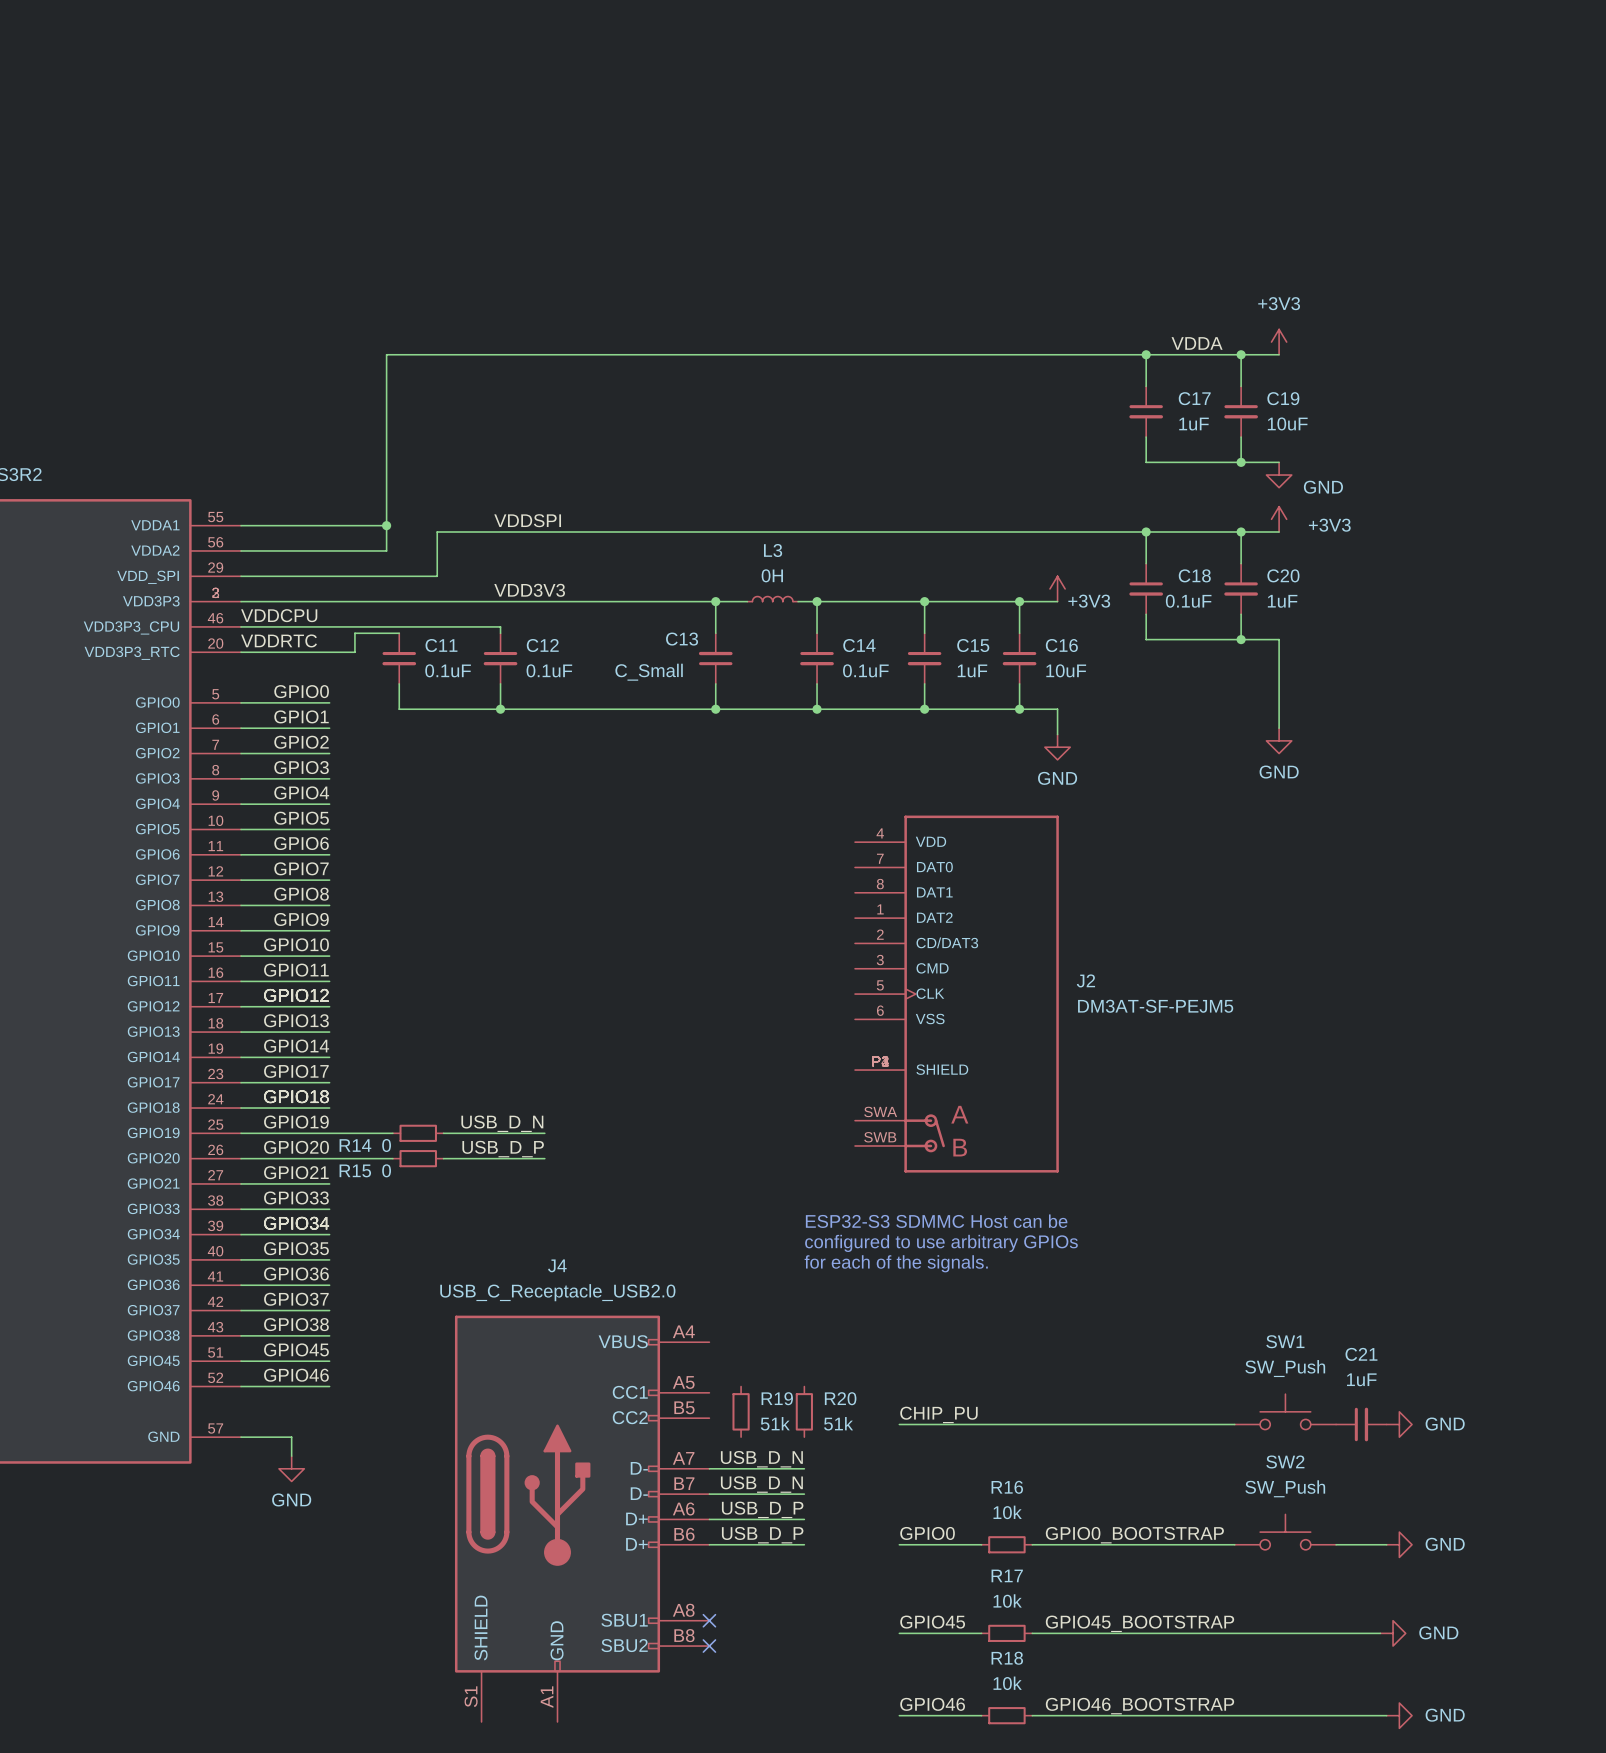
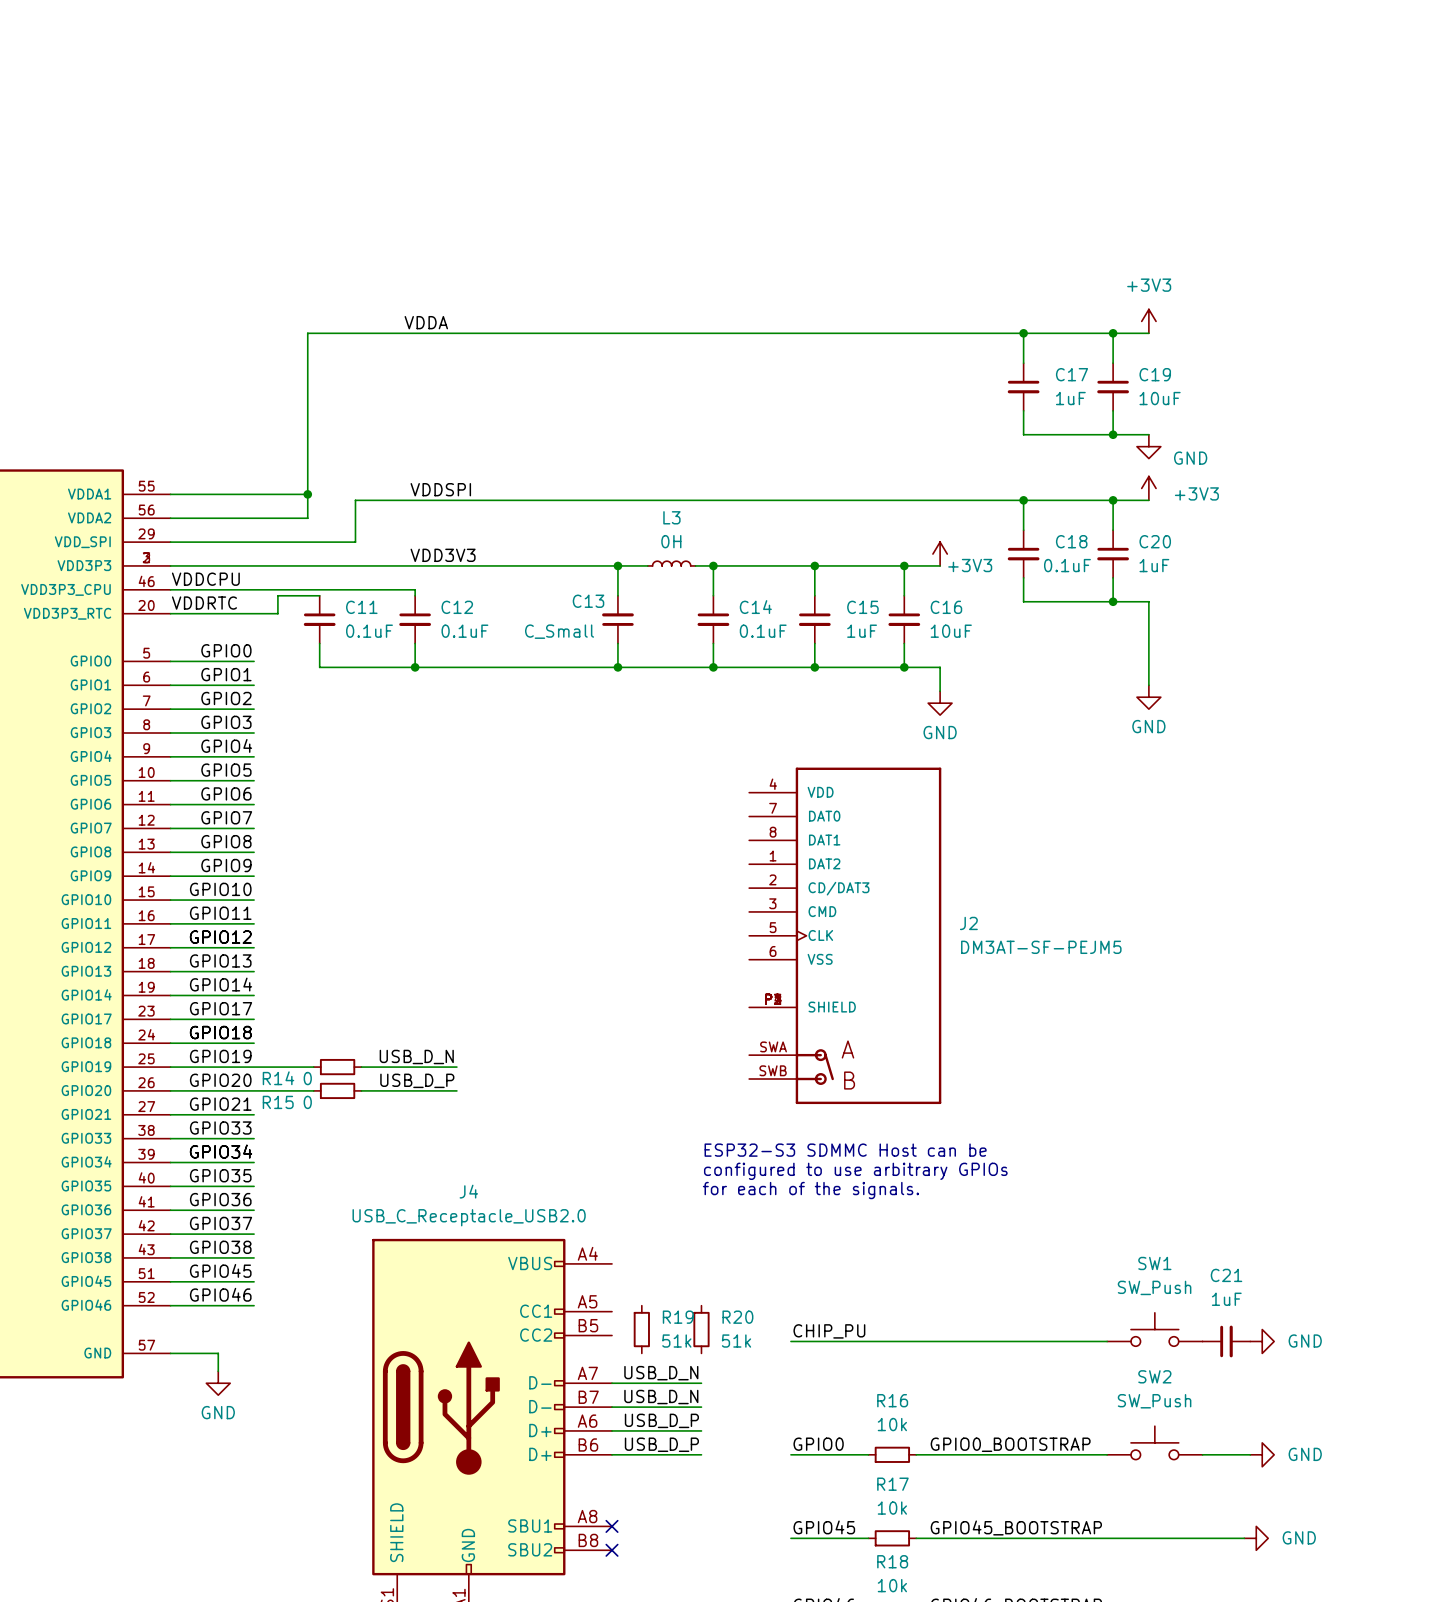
label: none -> VDDA (426, 322)
label: VDDA (1197, 343) -> none

